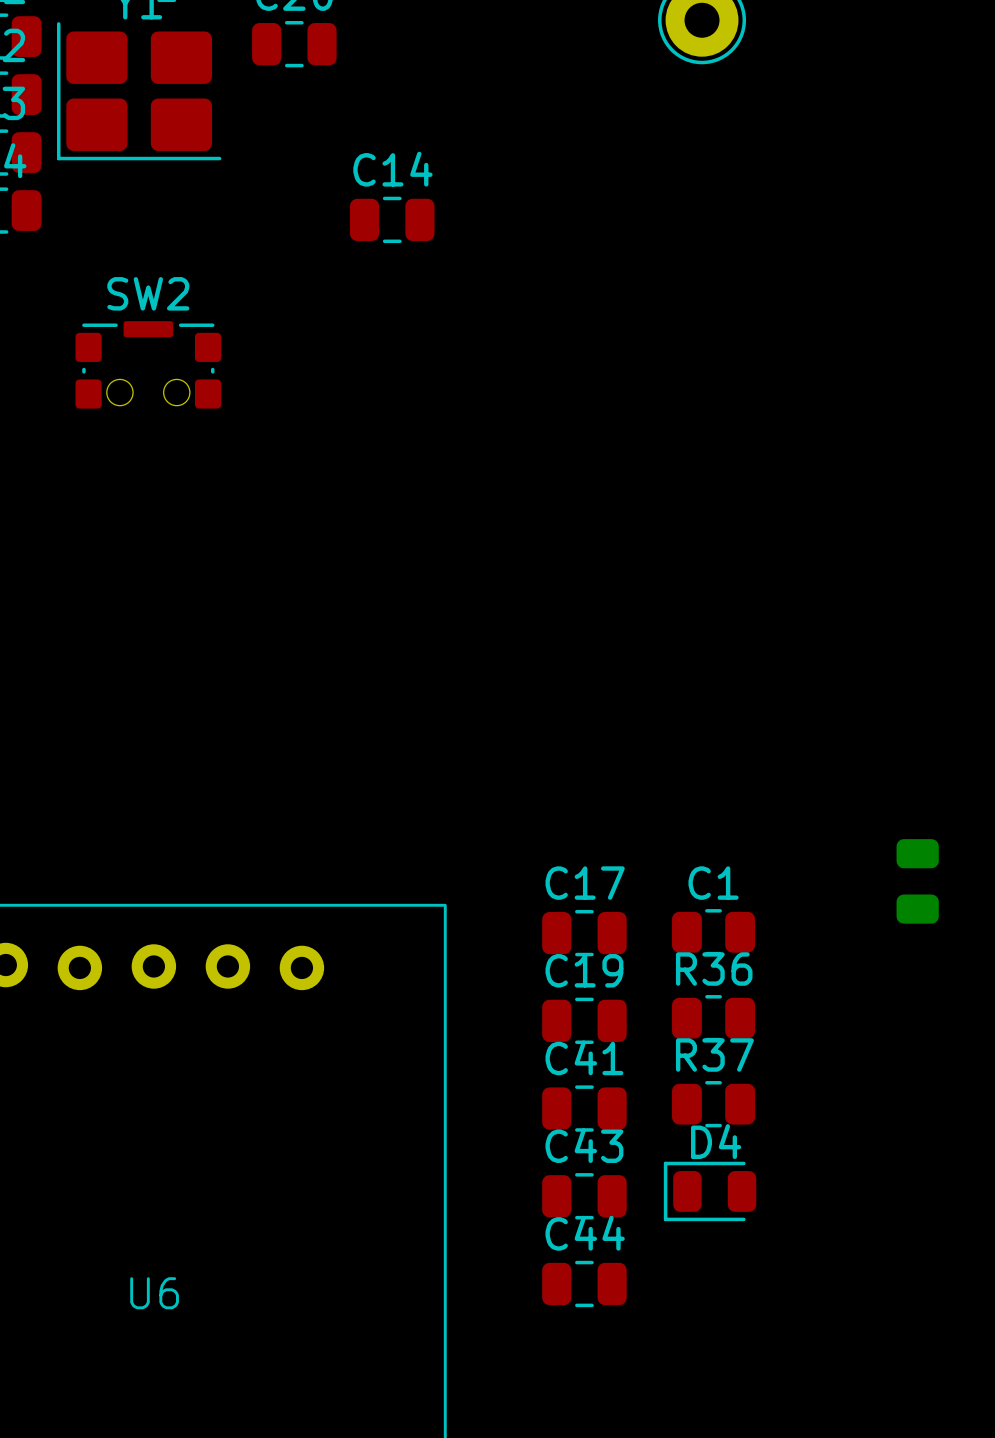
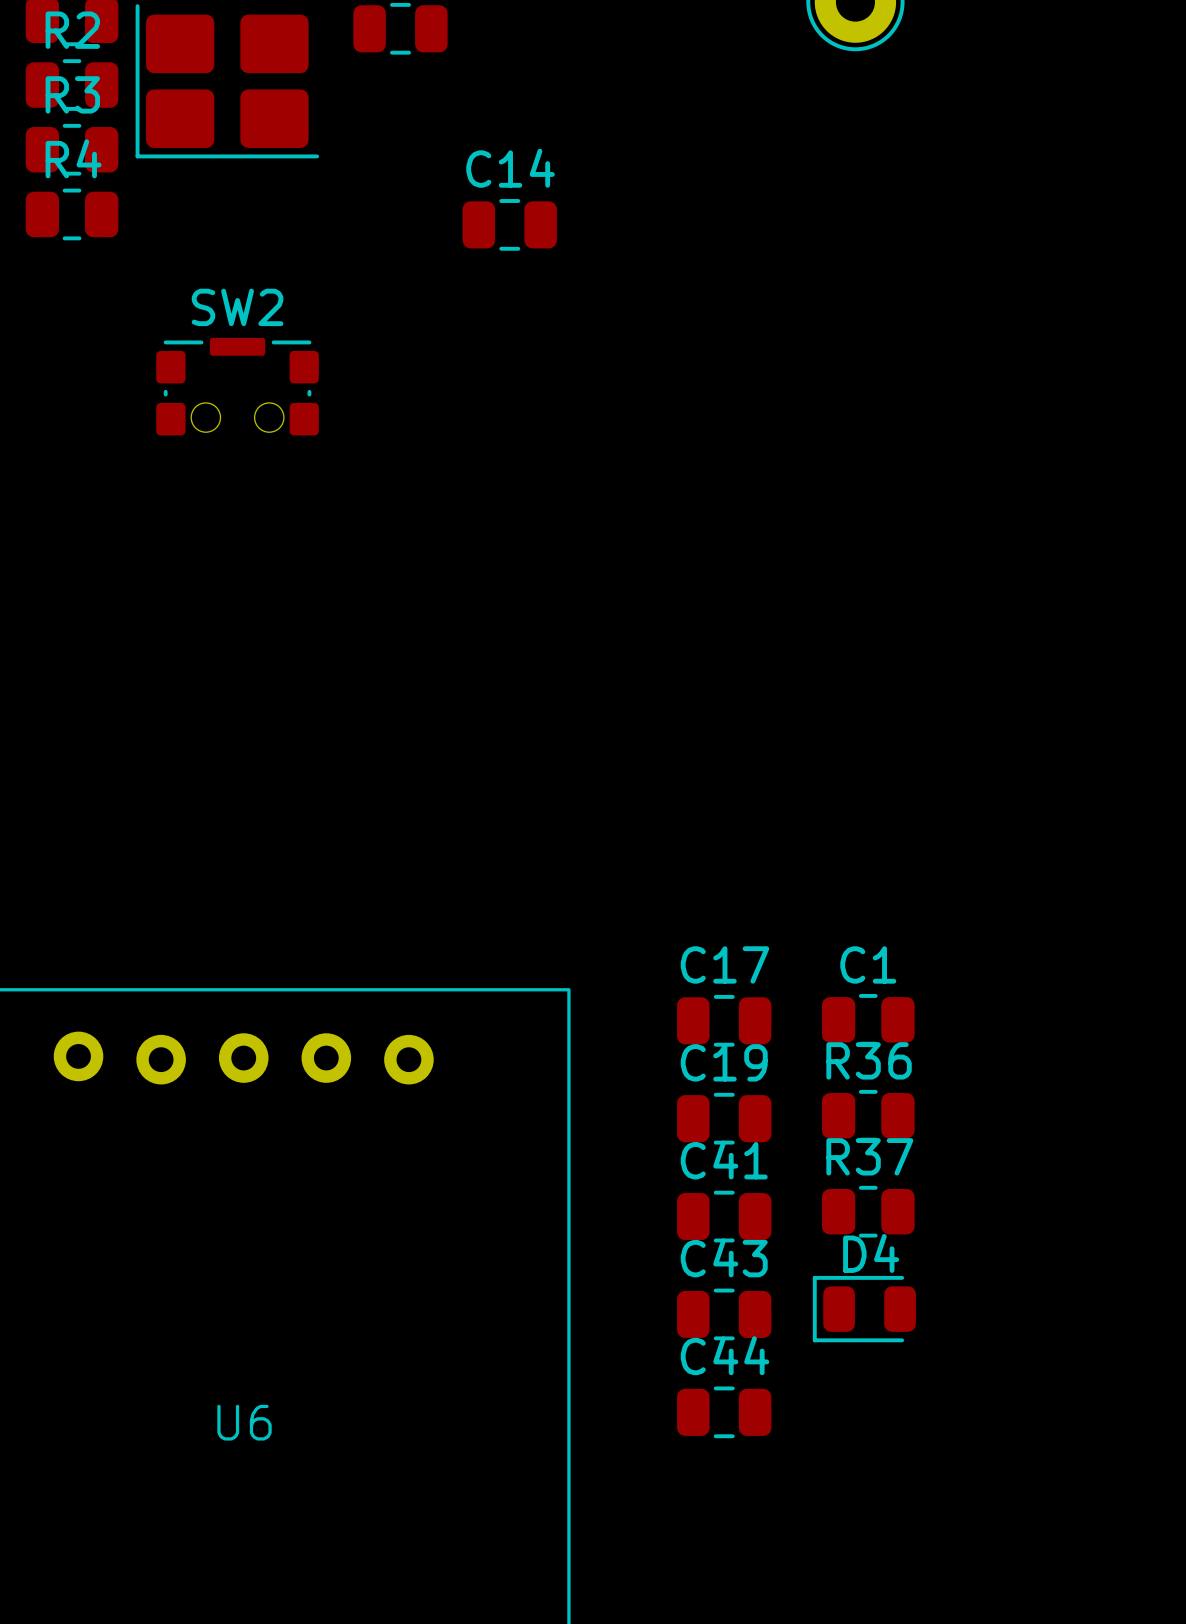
part: (917, 881) -> none

